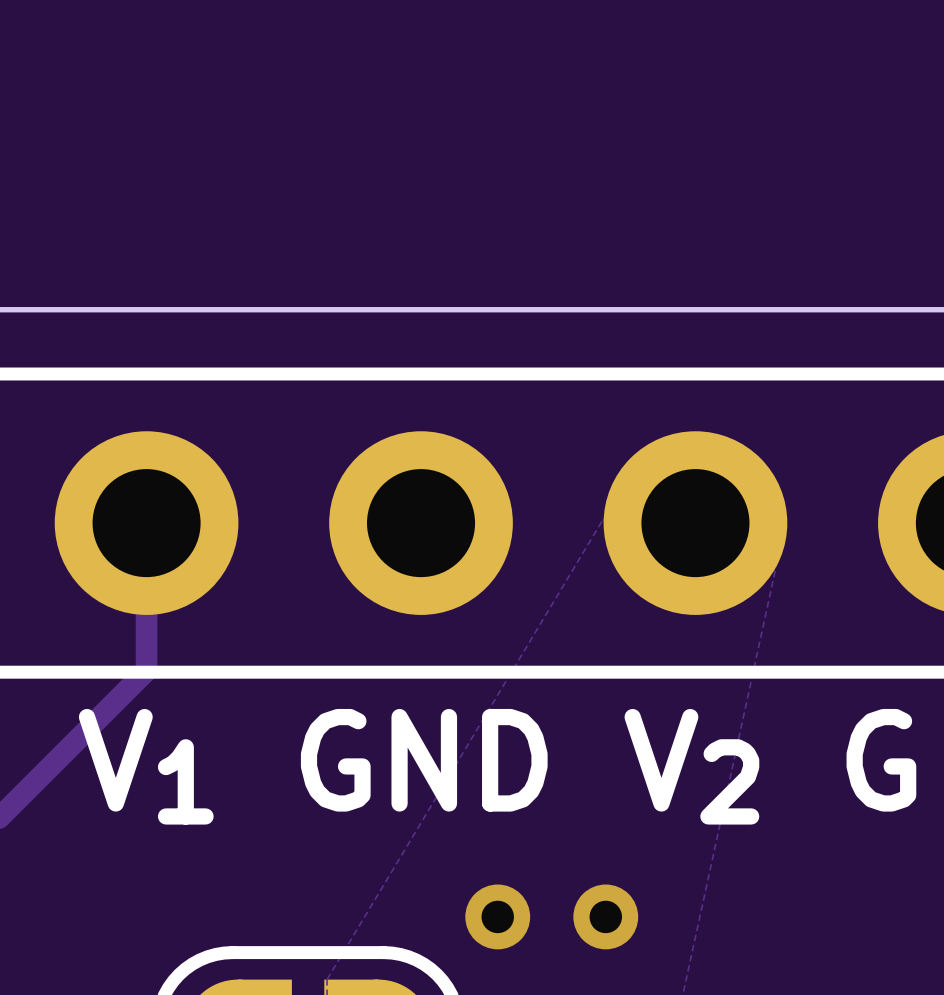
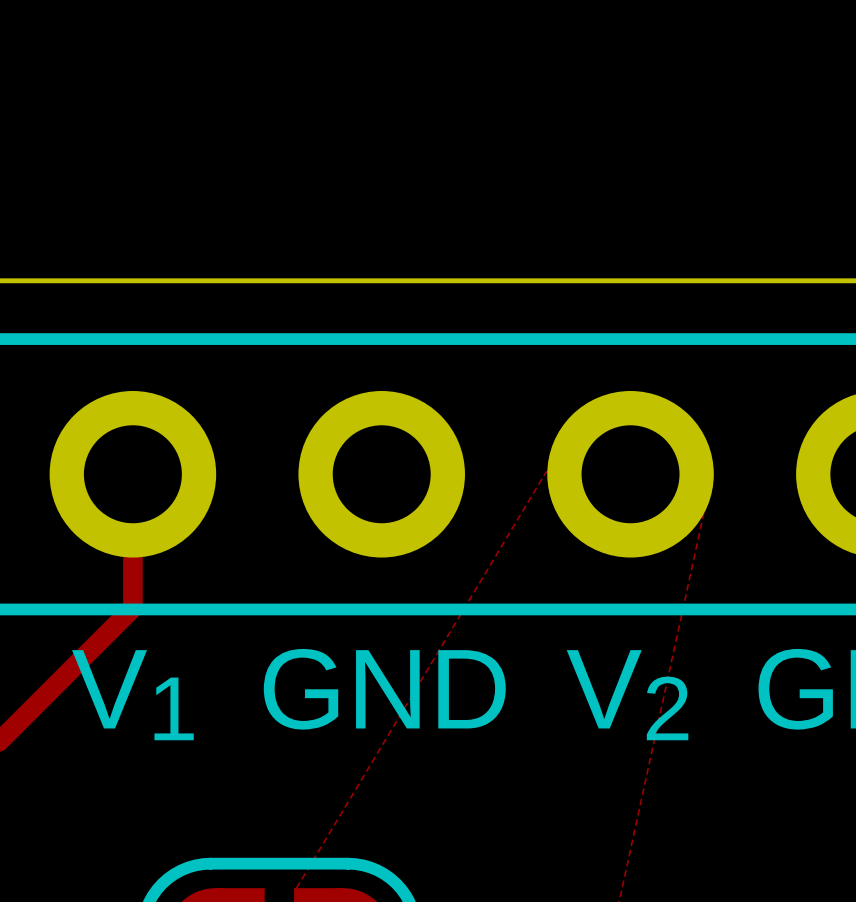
via: (497, 916) -> none
via: (605, 916) -> none

